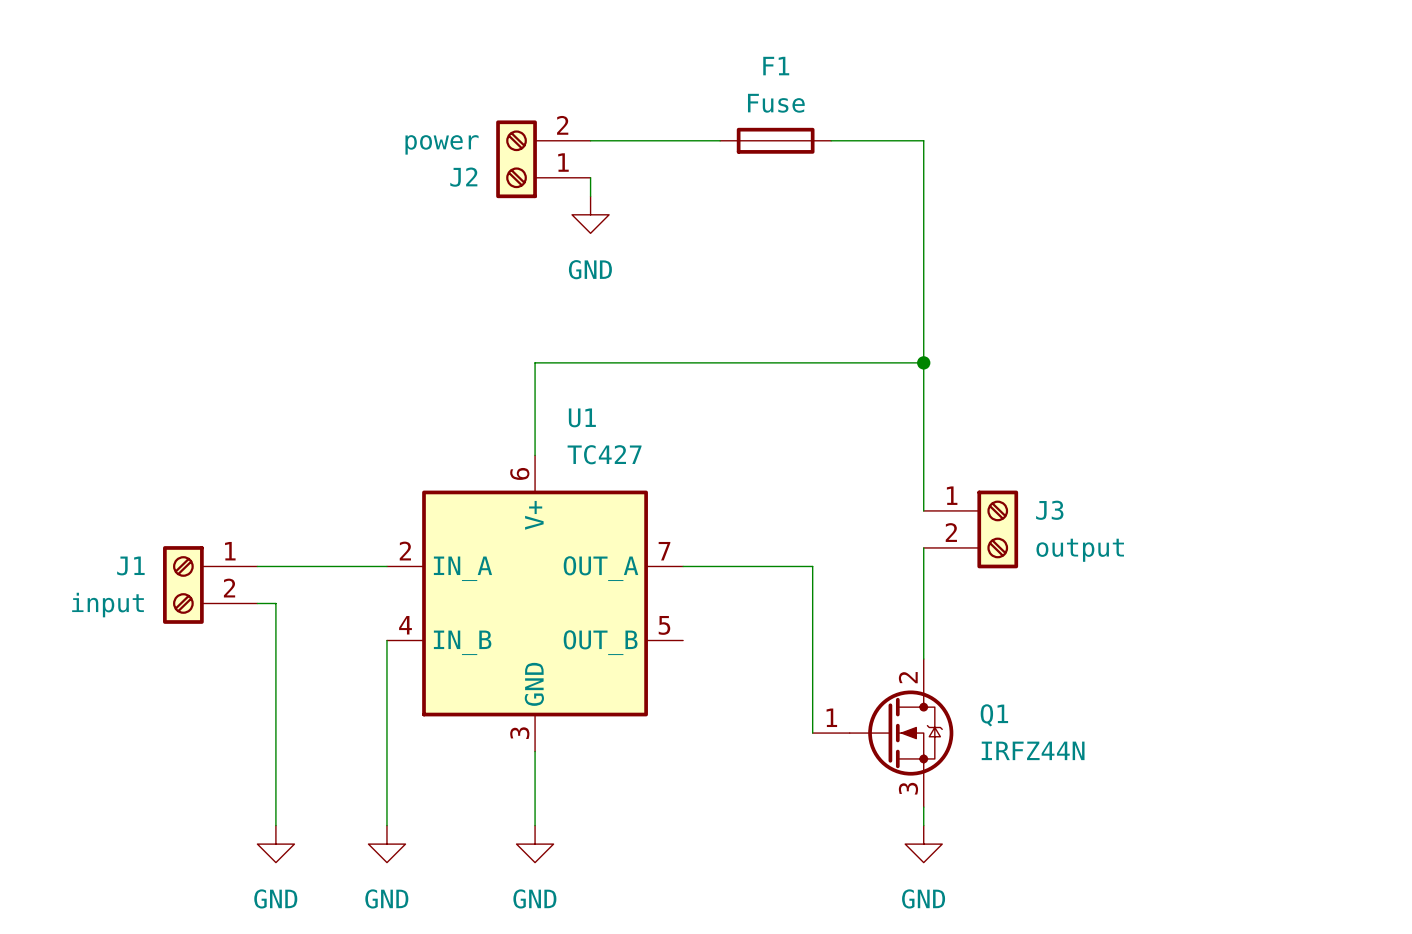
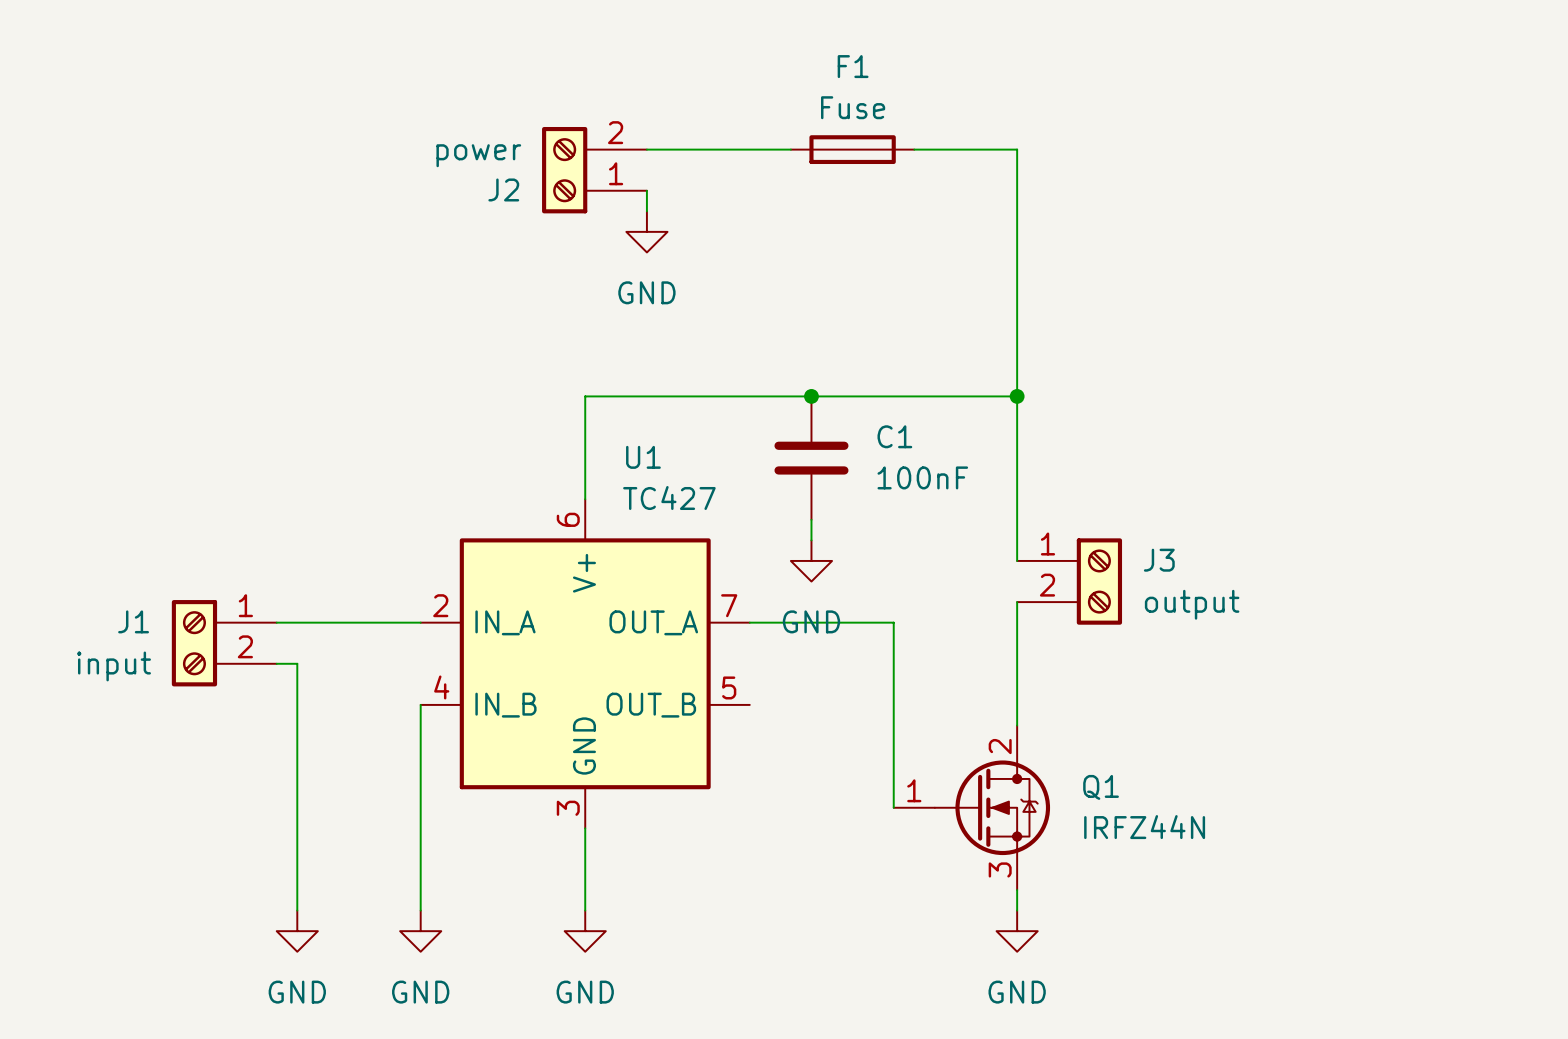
junction: none -> (811, 396)
C1: none -> 100nF (811, 458)
wire: none -> (811, 519) (811, 540)
power symbol: none -> GND (811, 560)

